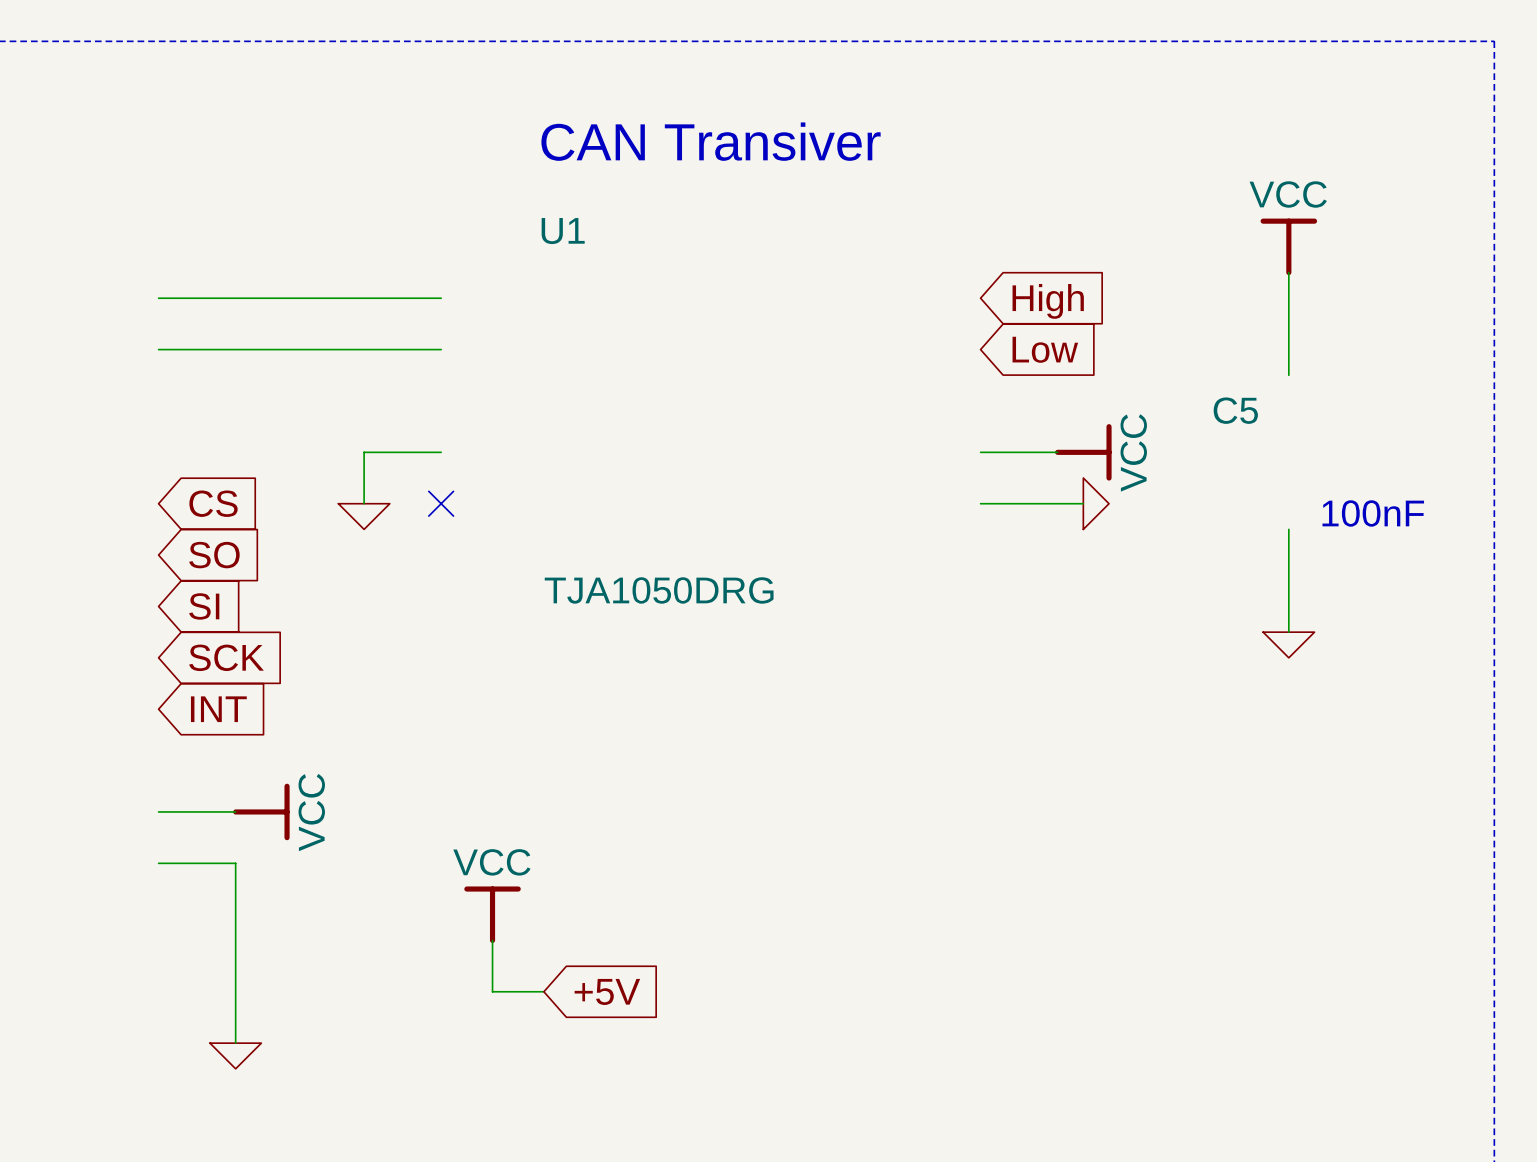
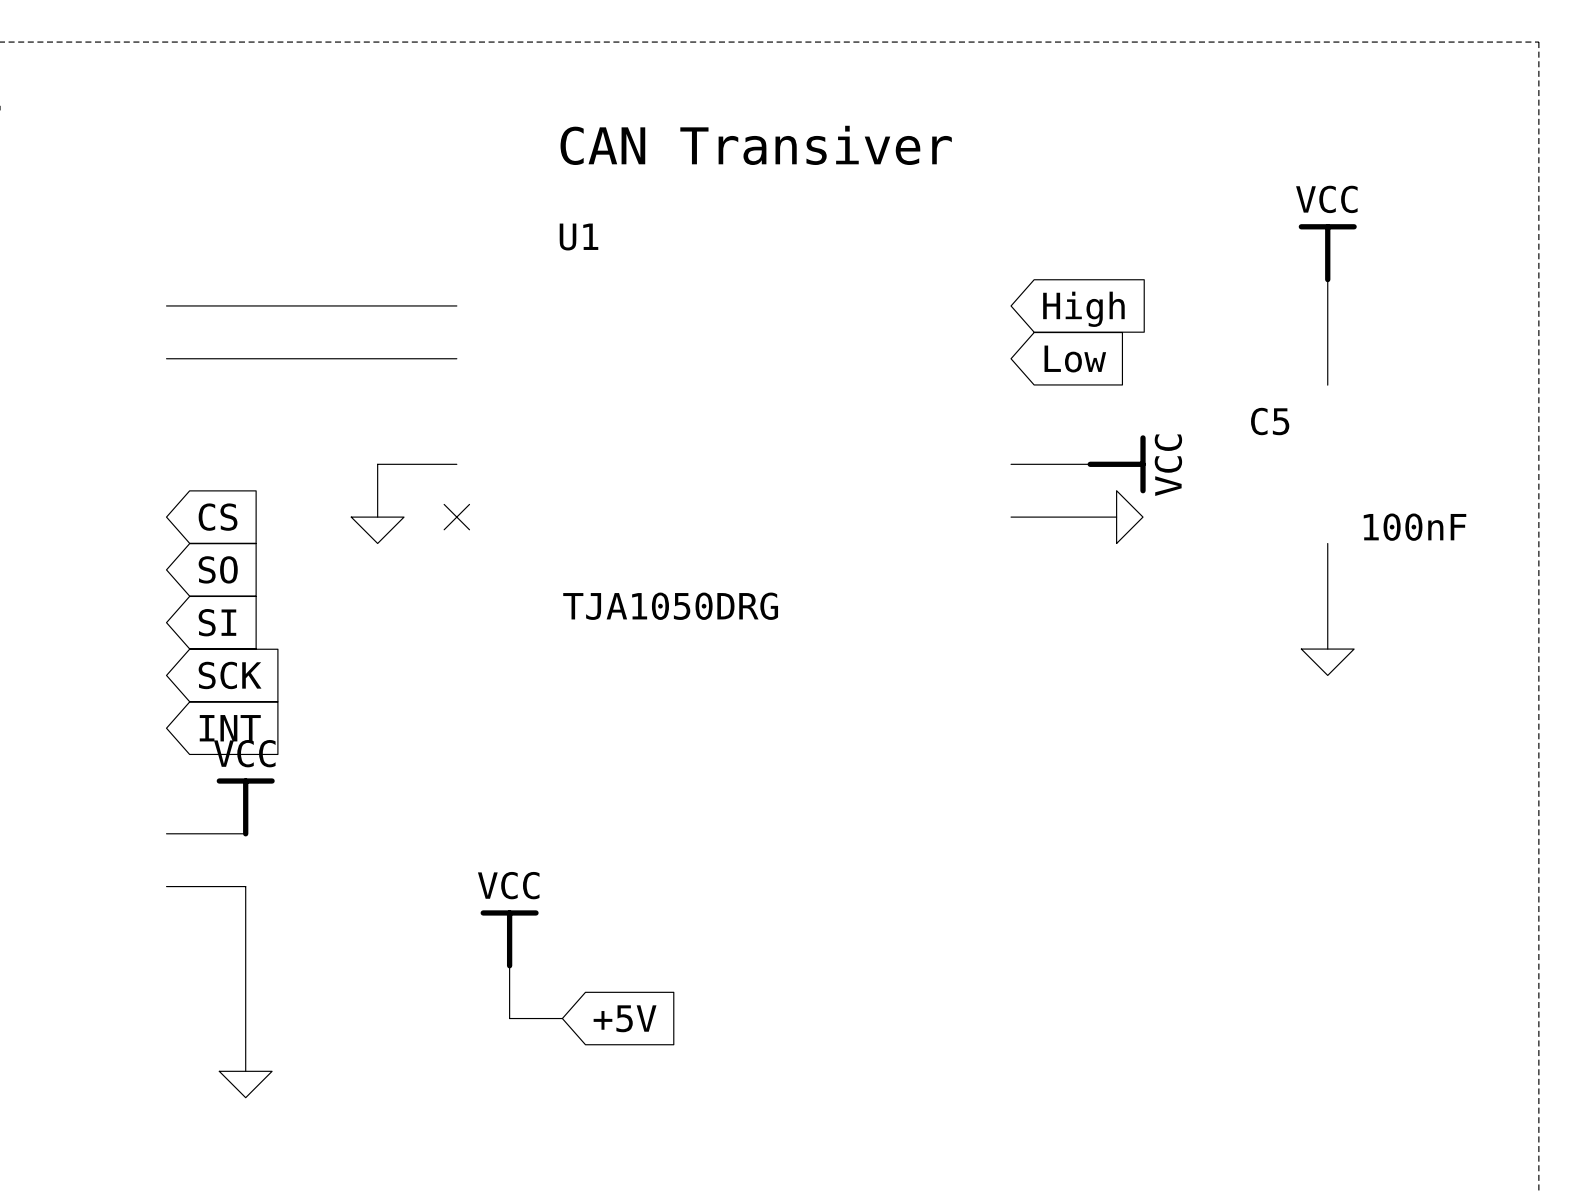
power symbol rotation: 0° (261, 811) -> 90° counterclockwise (245, 807)
power symbol position: VCC (261, 811) -> VCC (245, 807)

